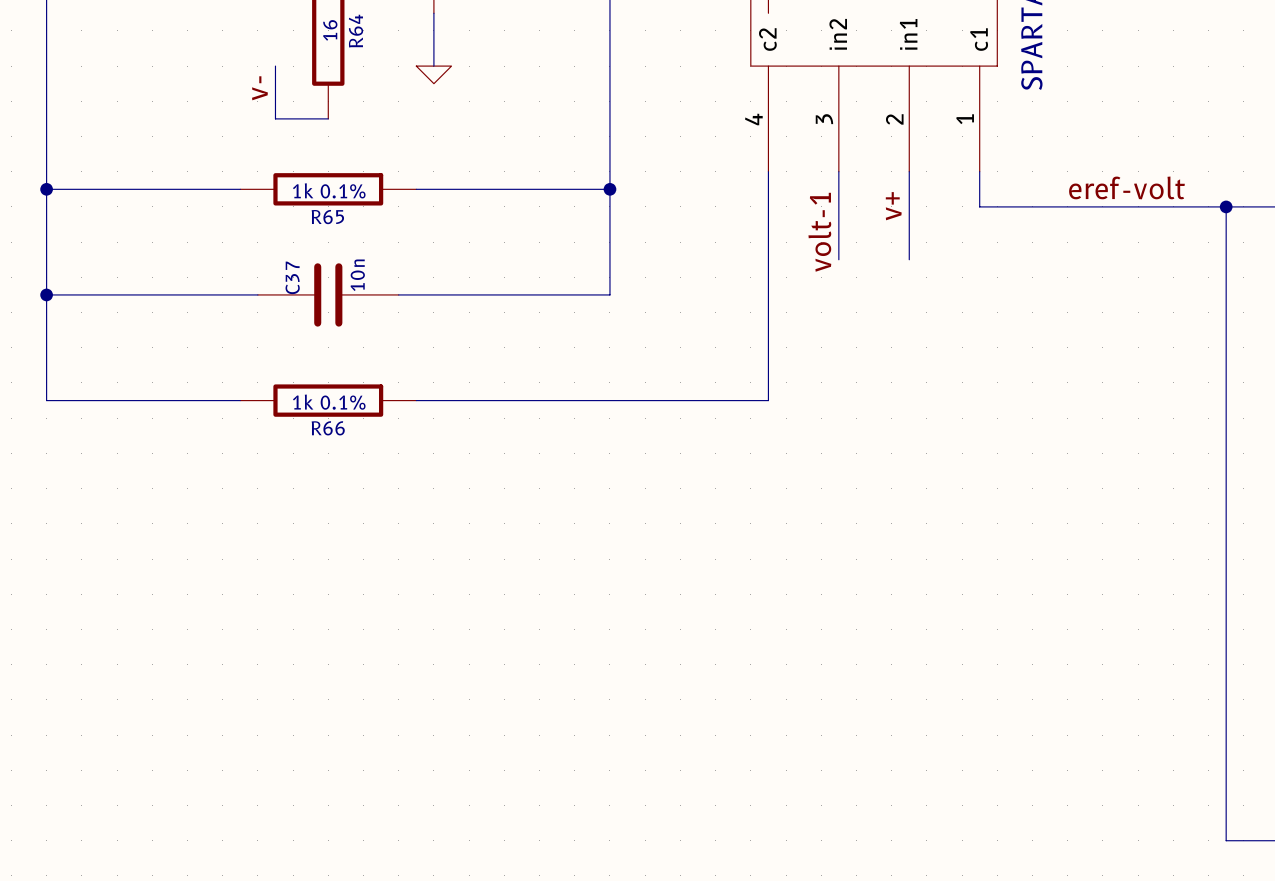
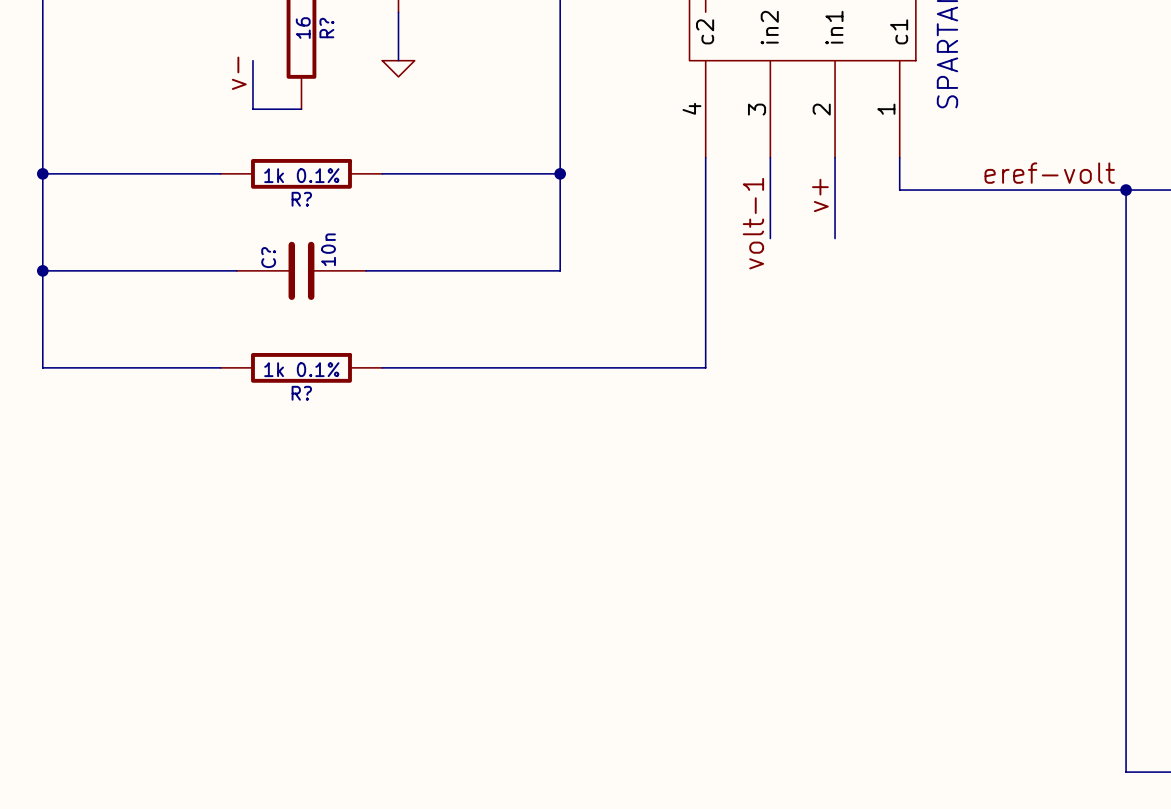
R64 name: R64 (356, 31) -> R? (326, 28)
R65 name: R65 (327, 217) -> R? (301, 199)
C37 name: C37 (292, 277) -> C? (268, 257)
R66 name: R66 (328, 428) -> R? (301, 393)

